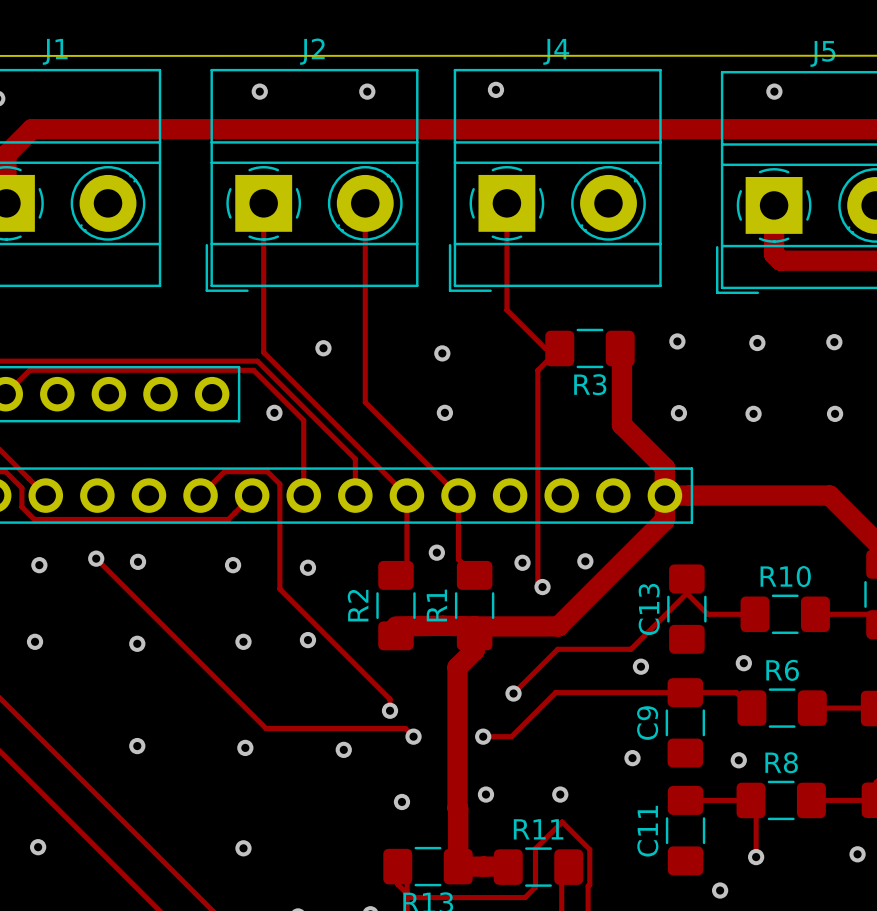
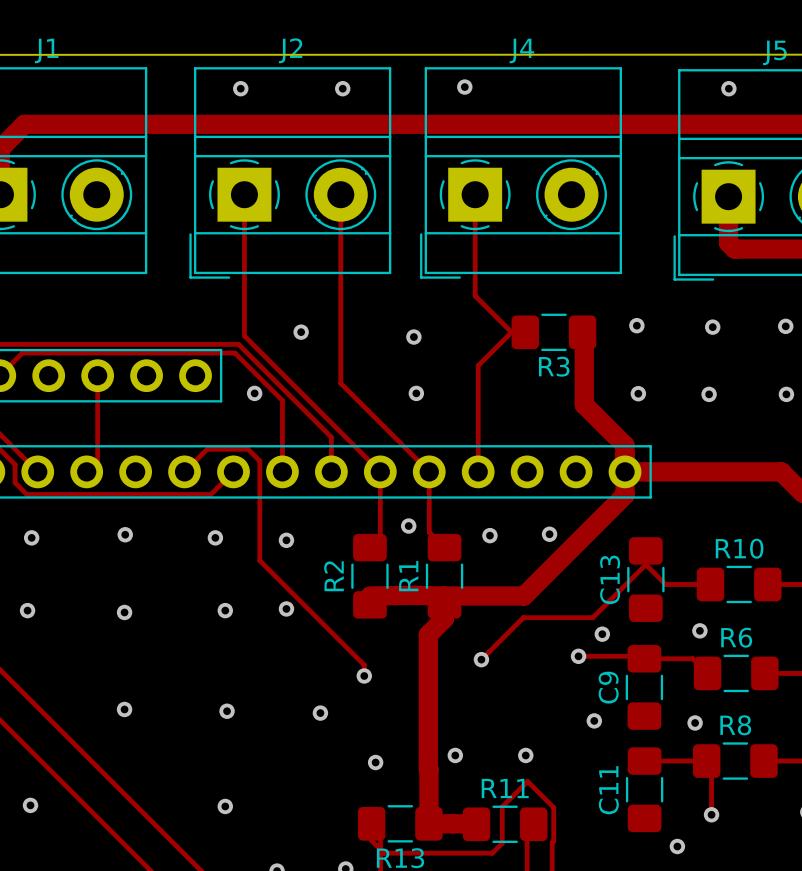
track: none -> (511, 332) (478, 365) (478, 471)
track: (559, 348) (537, 370) (537, 582) (542, 587) -> none
track: none -> (97, 375) (97, 460) (86, 471)
track: (96, 558) (266, 728) (405, 728) (413, 736) -> none
via: (96, 558) -> none
via: (542, 587) -> none
via: none -> (578, 656)
track: (685, 692) (555, 692) (511, 736) (483, 736) -> (644, 658) (641, 656) (578, 656)
via: (413, 736) -> none
via: (483, 736) -> none

